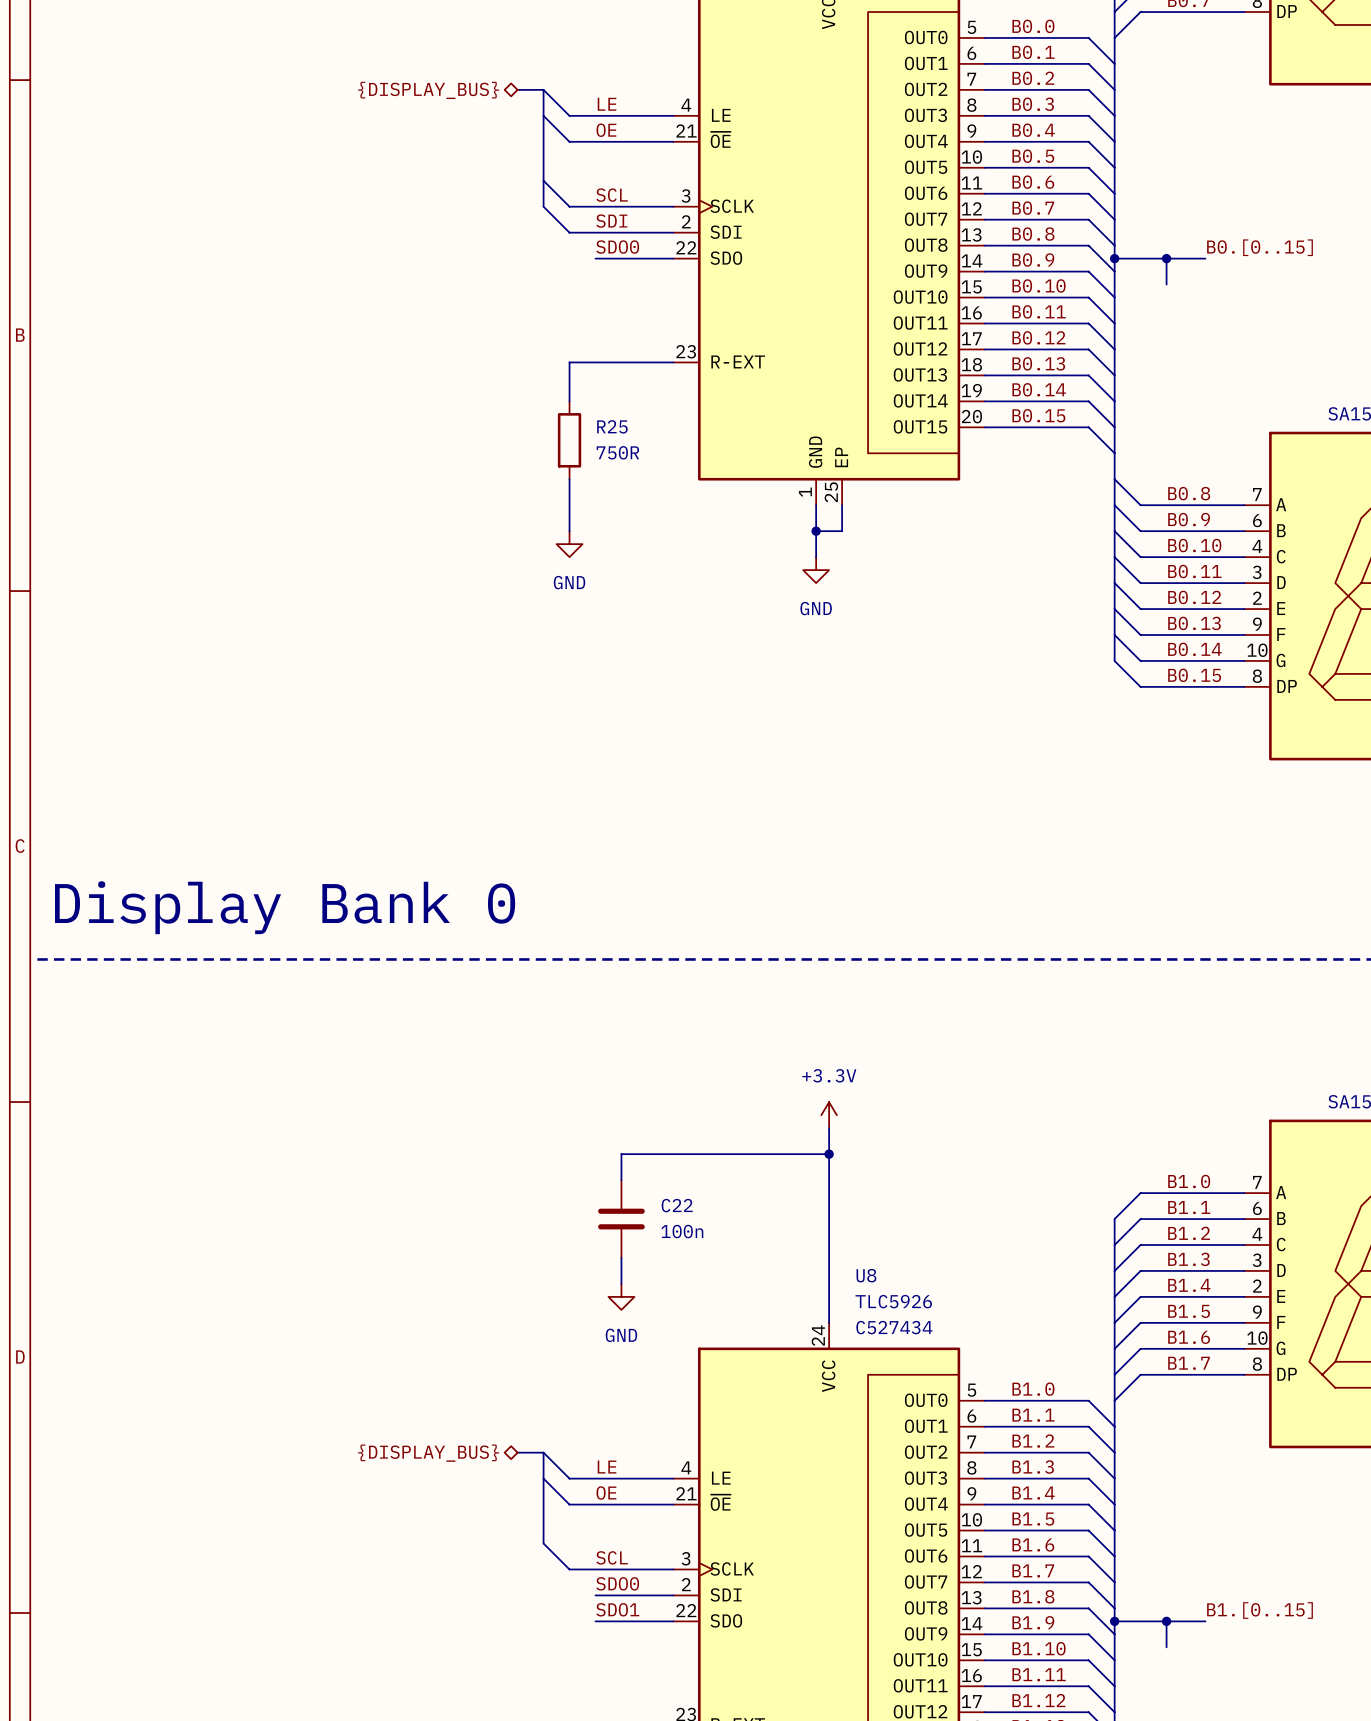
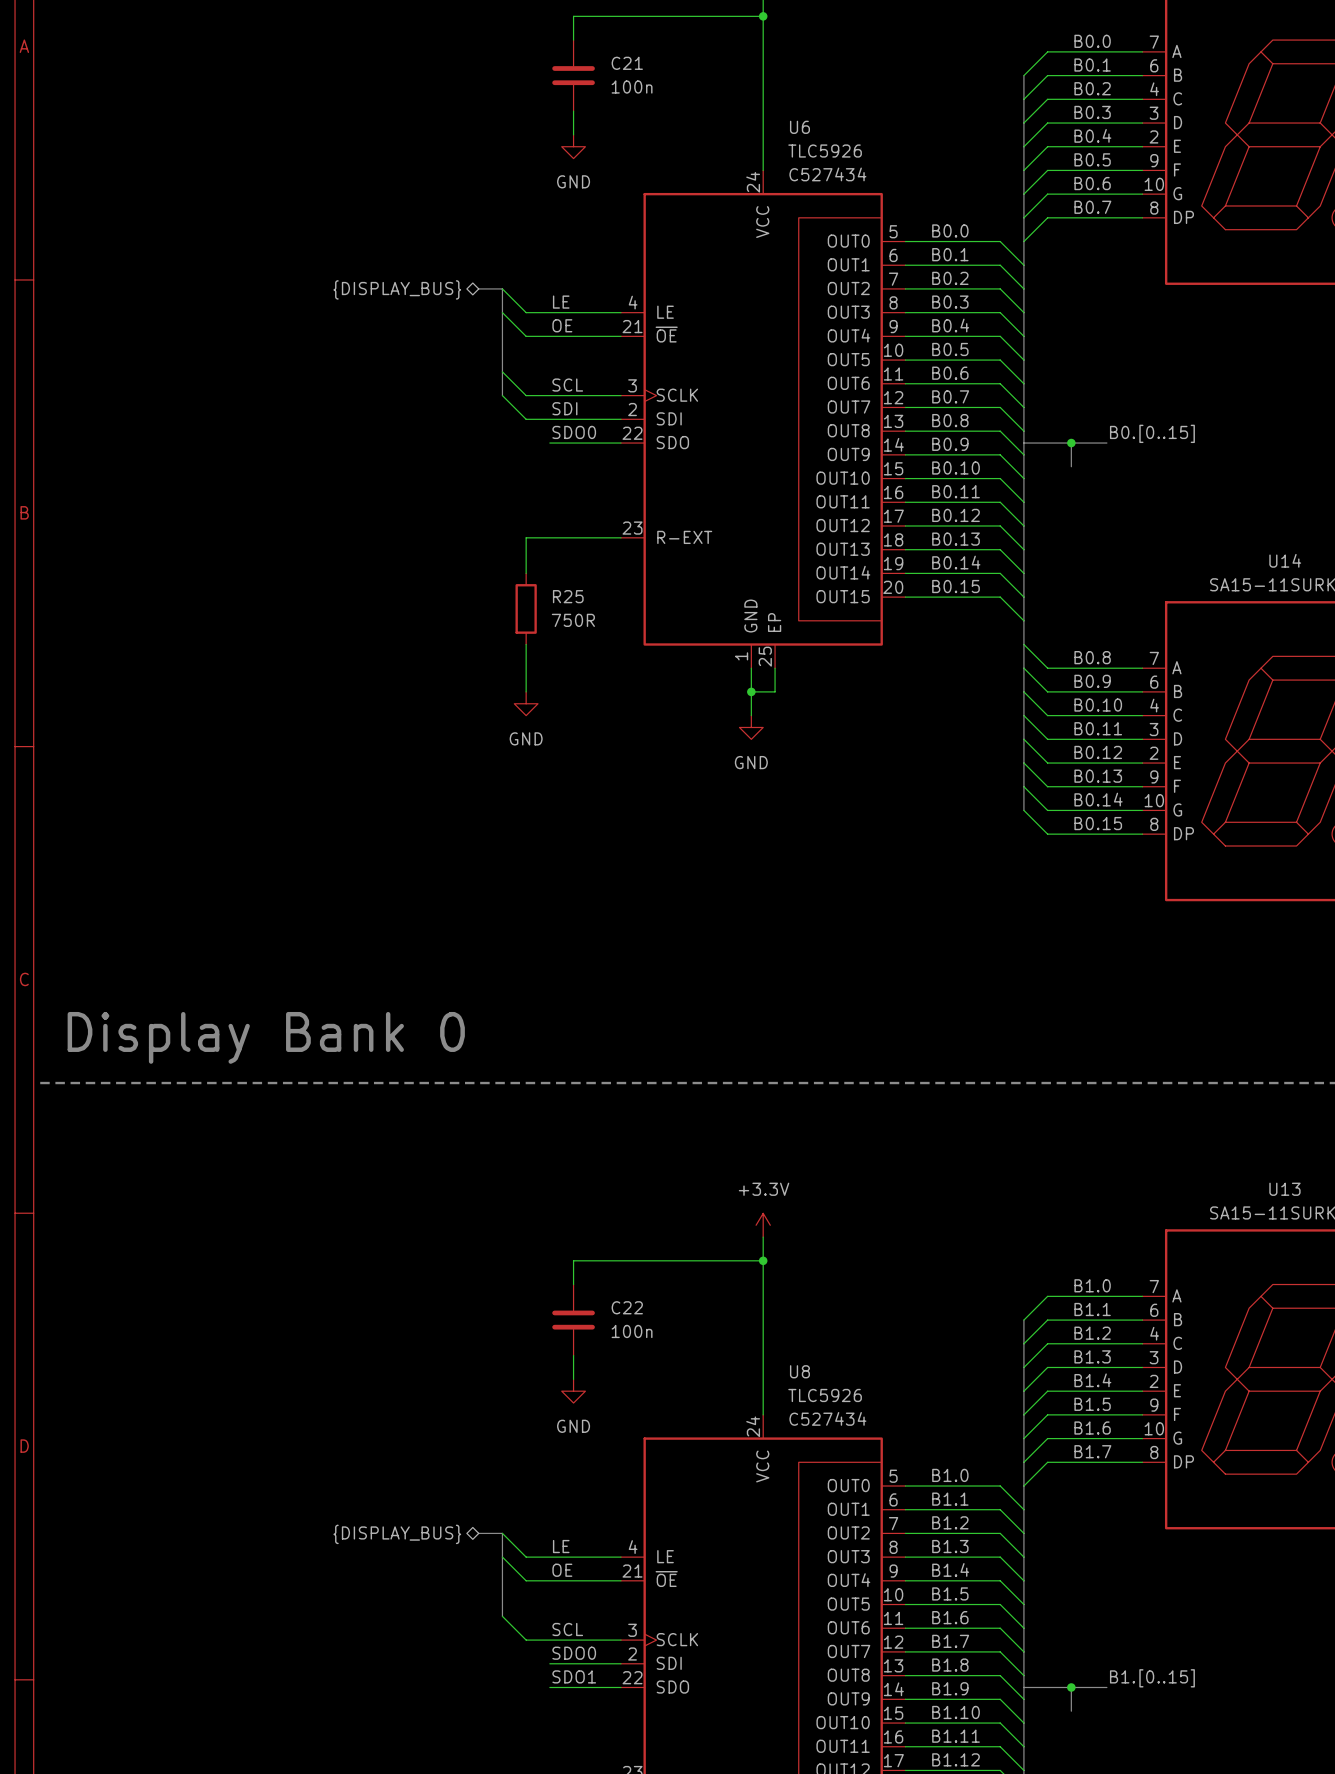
junction: (1114, 258) -> none
junction: (1114, 1621) -> none

